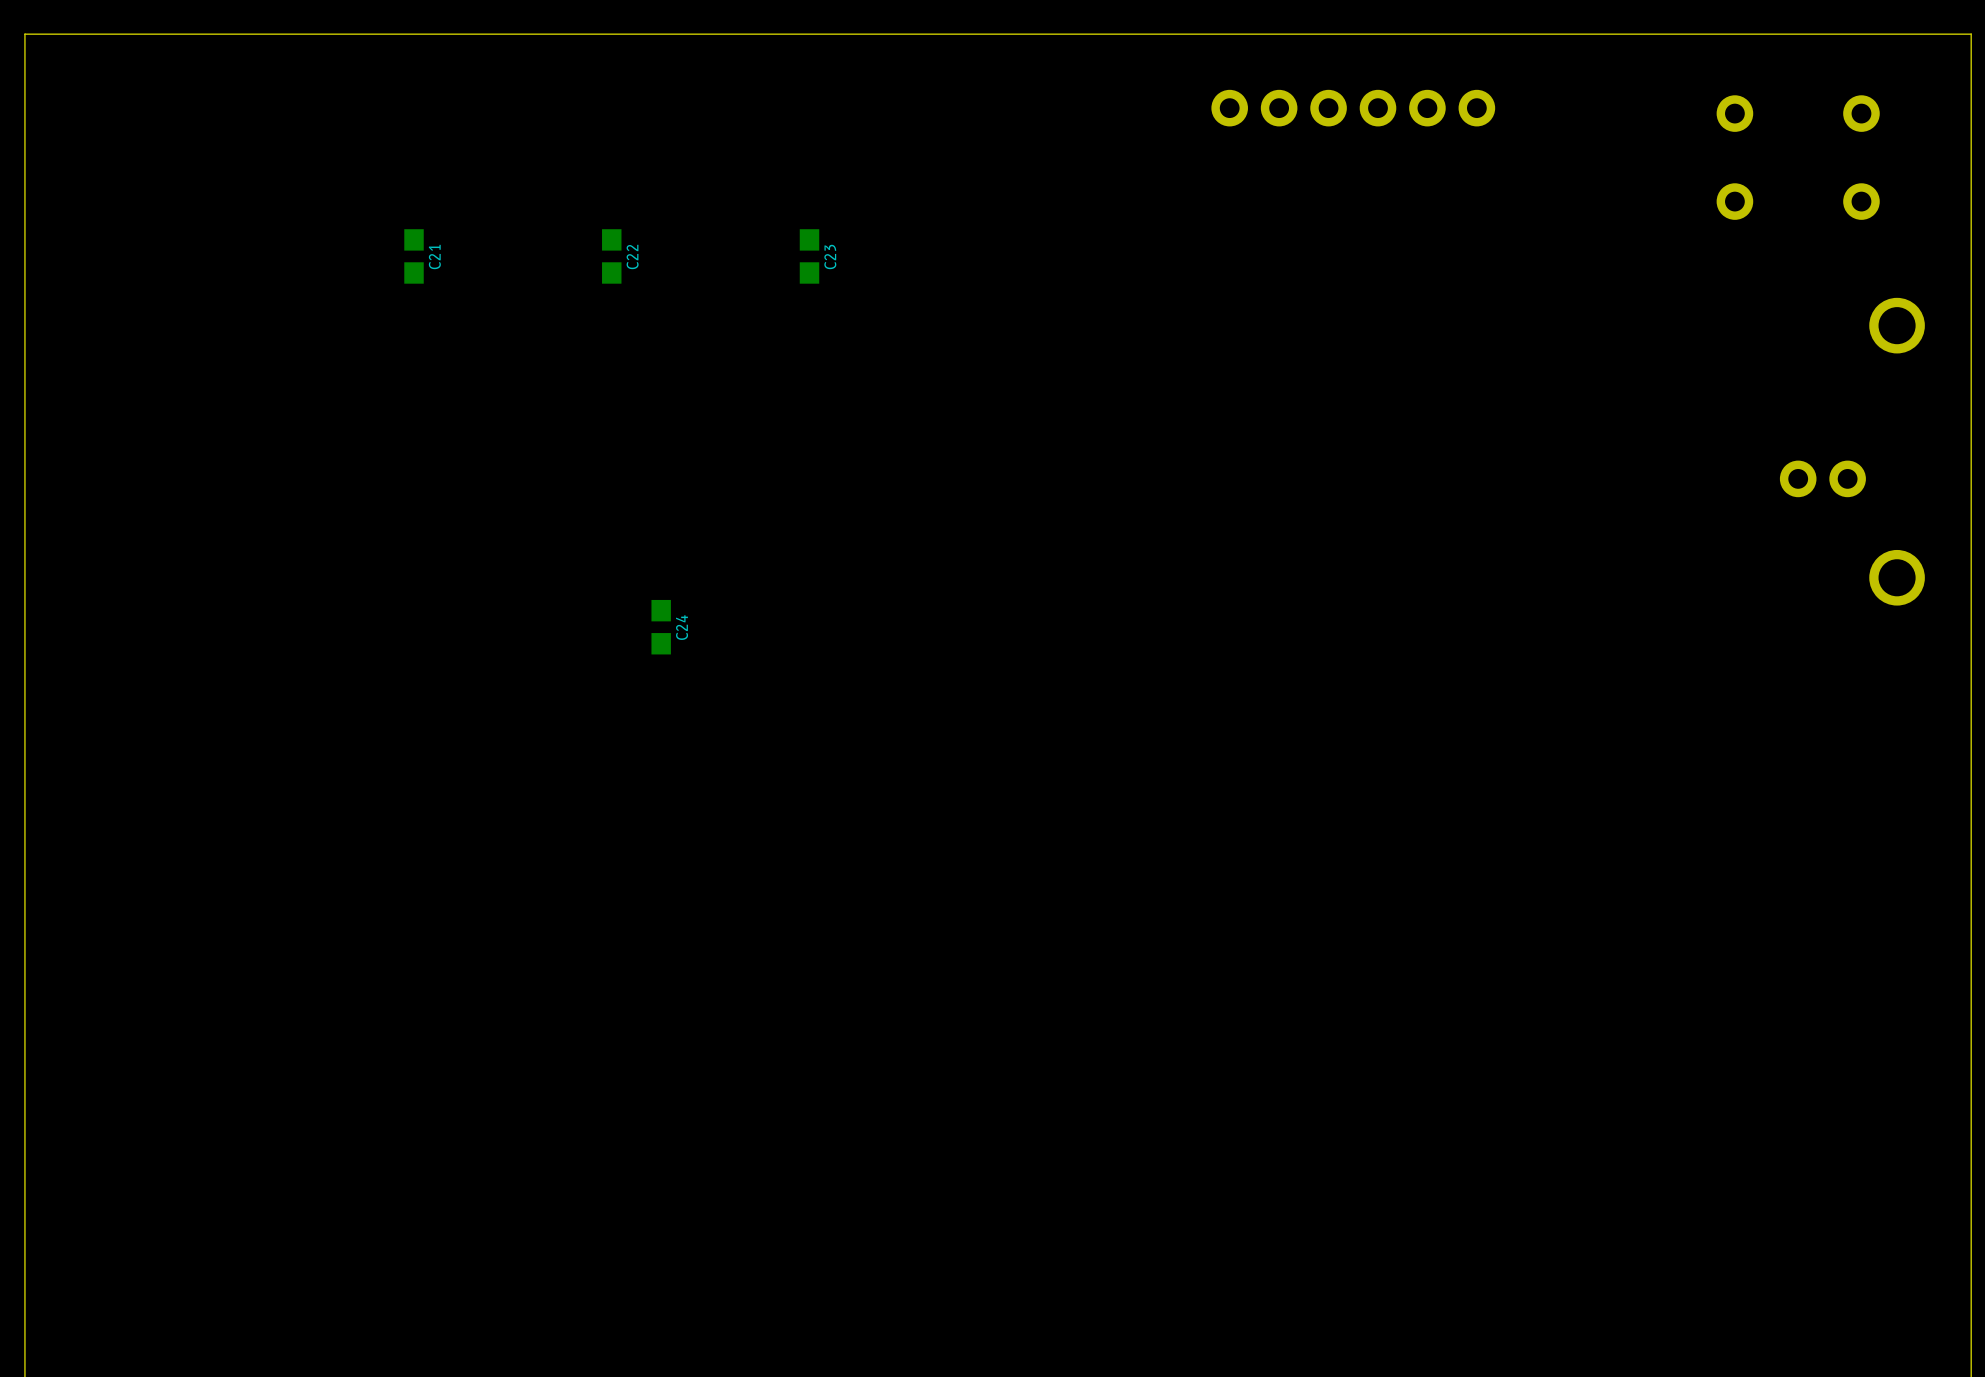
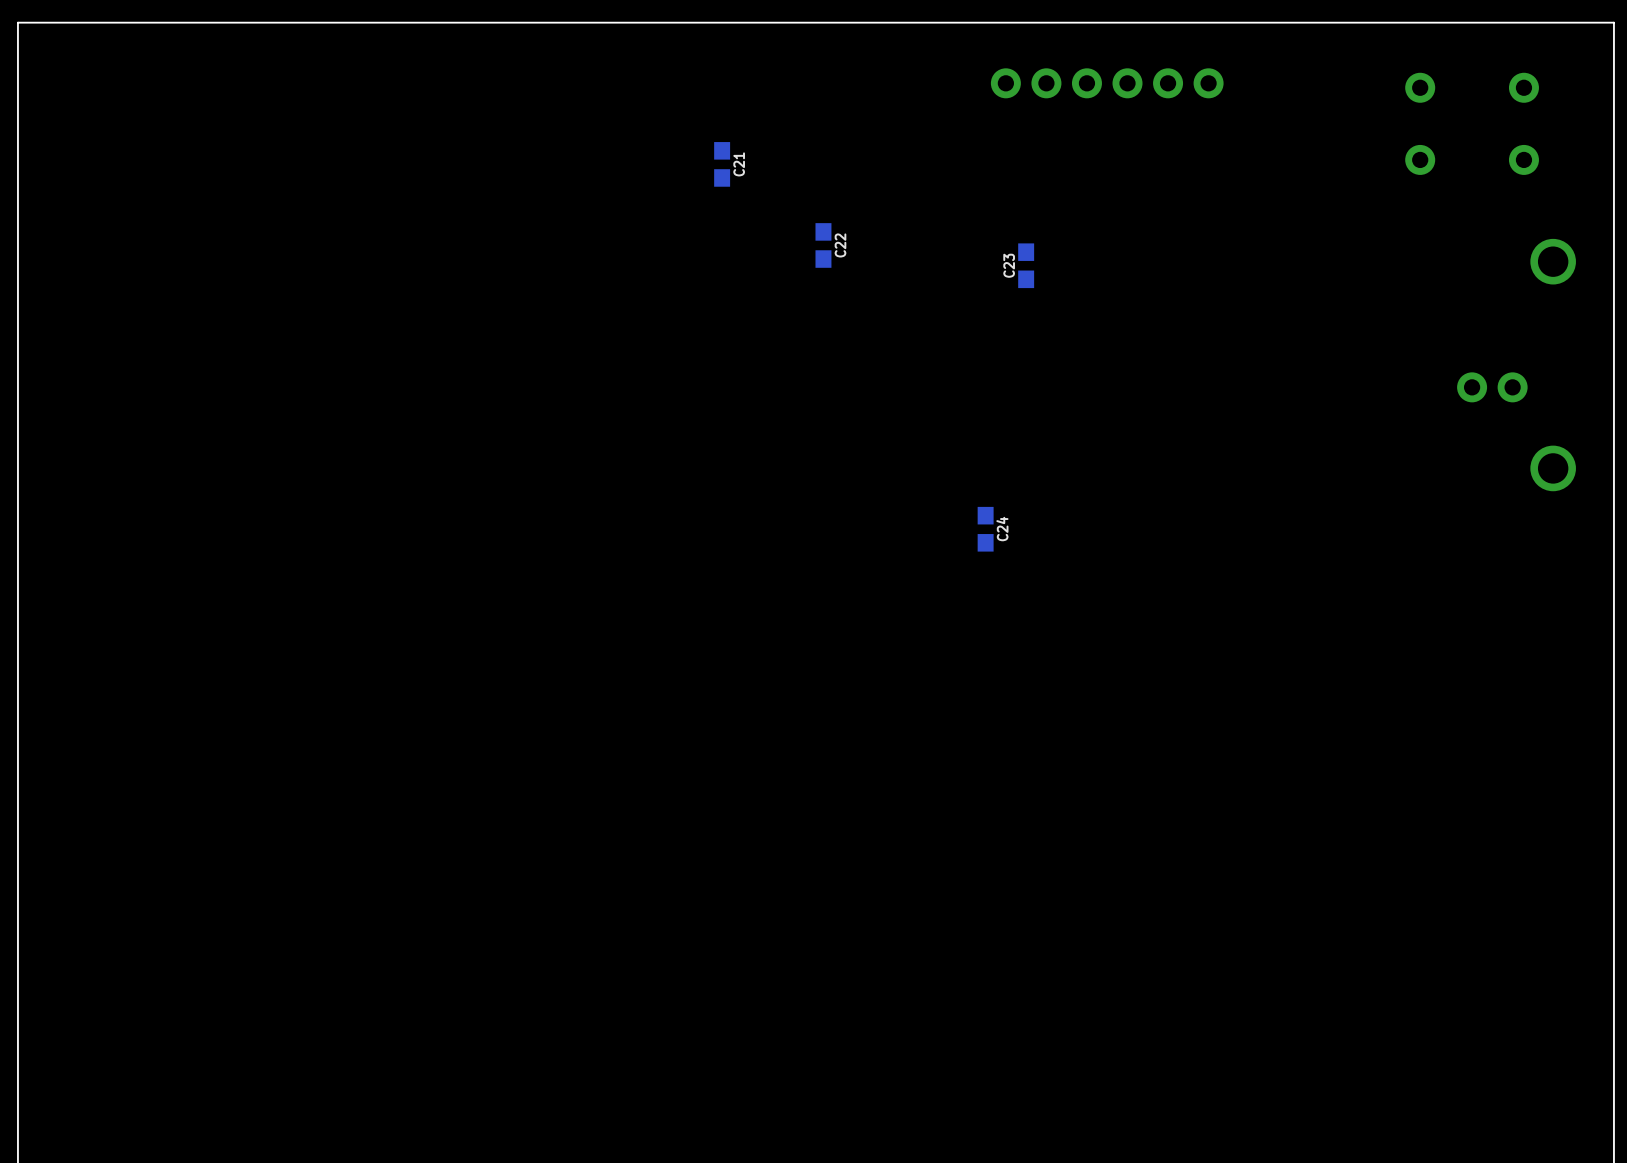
C21 position: (414, 256) -> (722, 164)
C22 position: (611, 256) -> (823, 245)
C23 position: (809, 256) -> (1026, 265)
C23 name position: C23 (830, 256) -> C23 (1009, 265)
C24 position: (661, 627) -> (985, 529)

